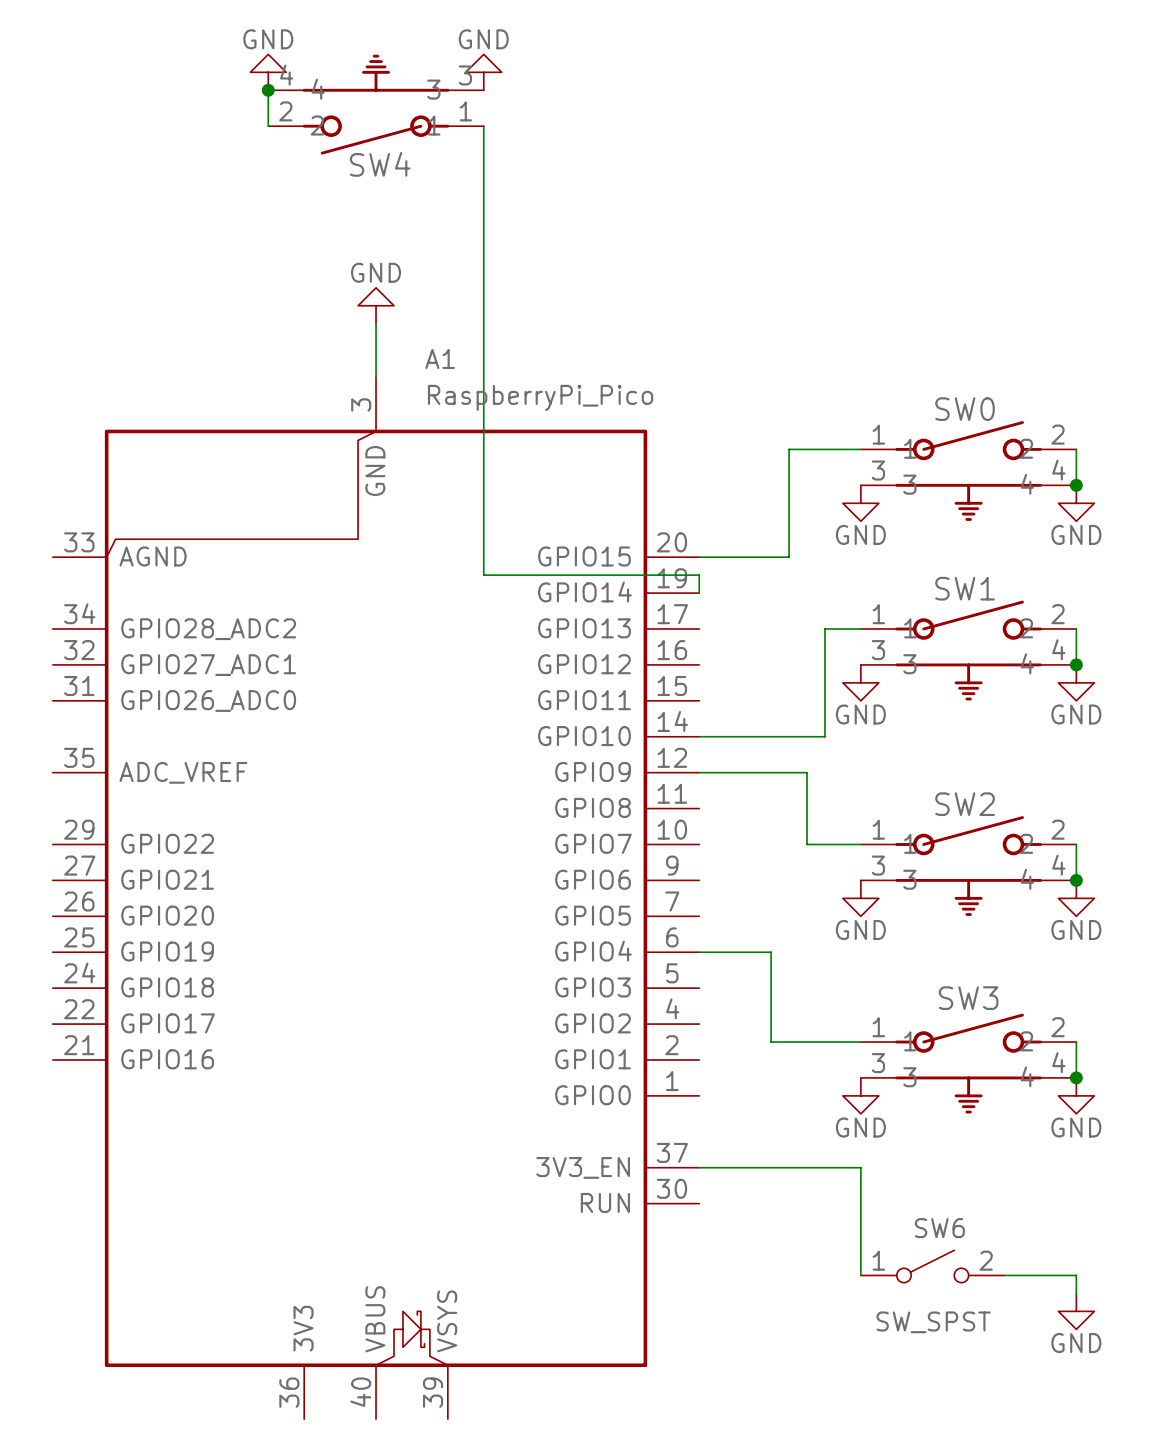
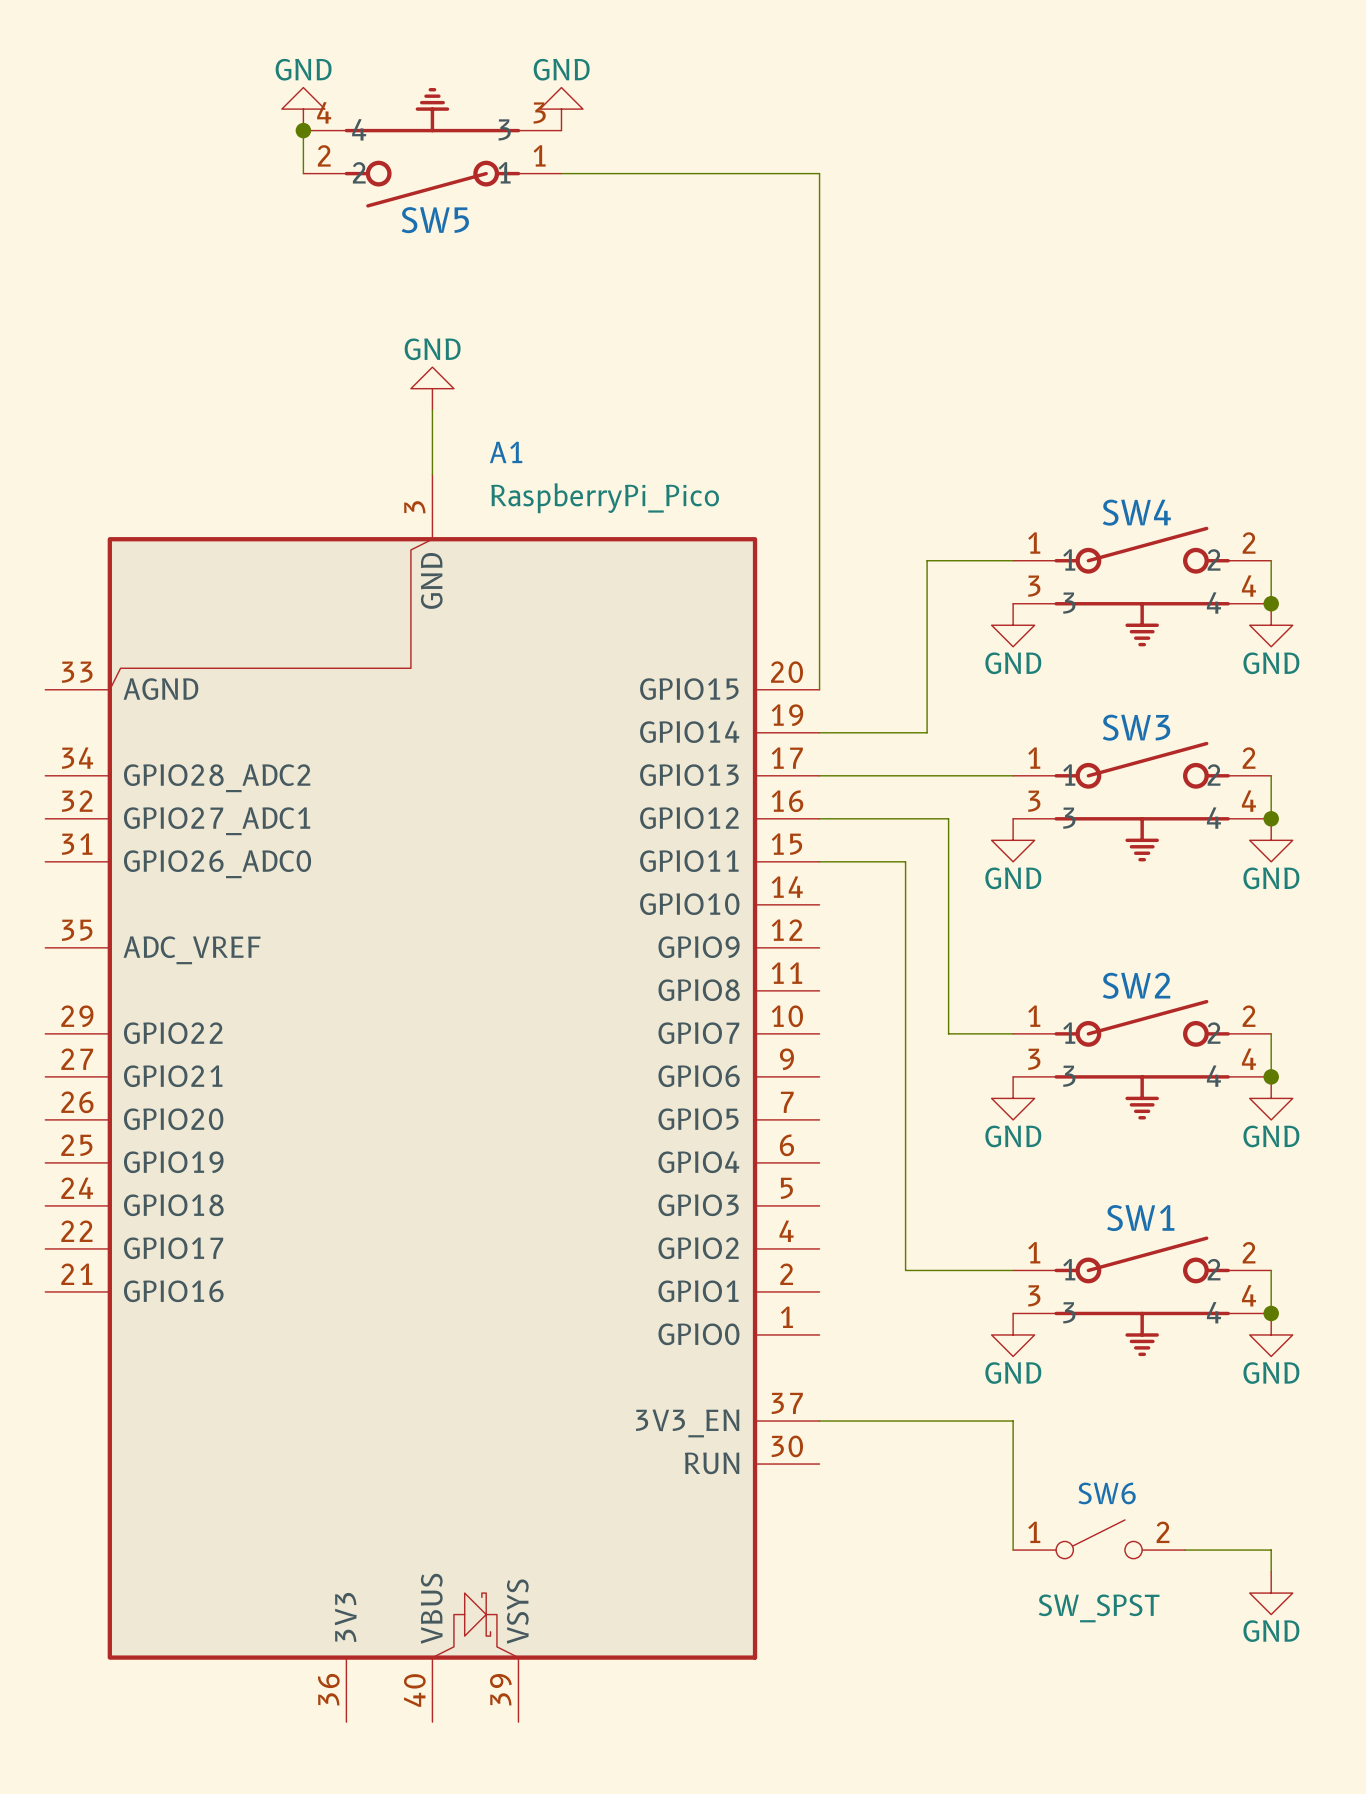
wire: (483, 126) (483, 575) (699, 575) (699, 593) -> (561, 173) (819, 173) (819, 689)
SW4 name: SW4 (380, 164) -> SW5 (435, 220)
SW0 name: SW0 (965, 409) -> SW4 (1136, 512)
wire: (699, 557) (789, 557) -> (819, 732) (927, 732) (927, 689)
SW1 name: SW1 (965, 588) -> SW3 (1136, 727)
wire: (824, 629) (824, 736) (699, 736) -> (970, 775) (819, 775)
wire: (699, 772) (807, 772) -> (819, 818) (948, 818) (948, 947)
wire: (699, 952) (771, 952) -> (819, 861) (905, 861) (905, 1162)
SW3 name: SW3 (968, 998) -> SW1 (1140, 1218)

